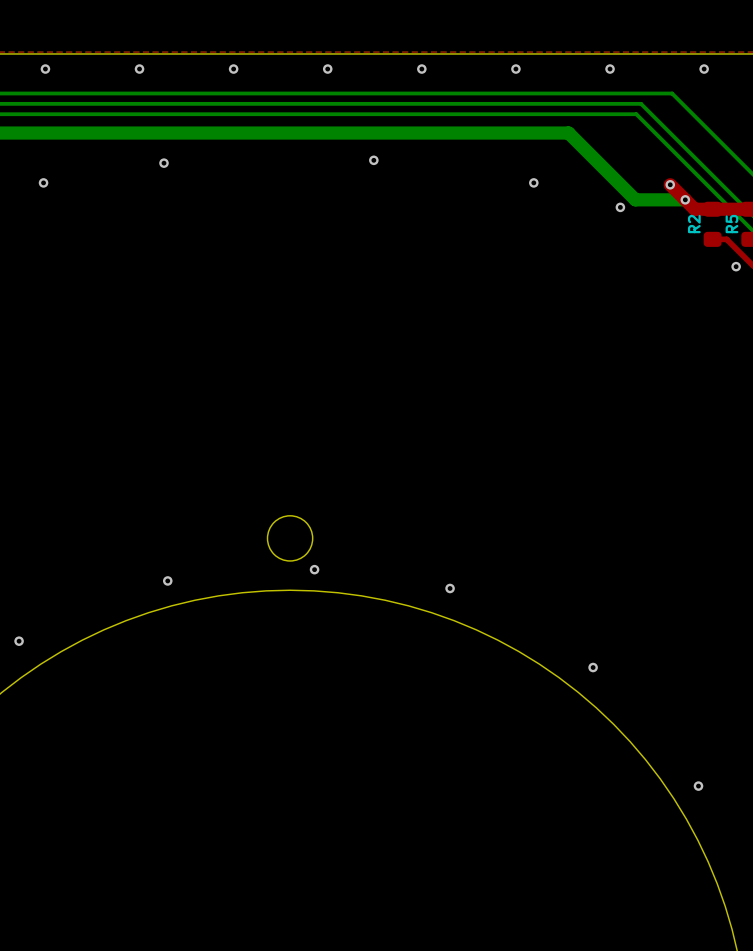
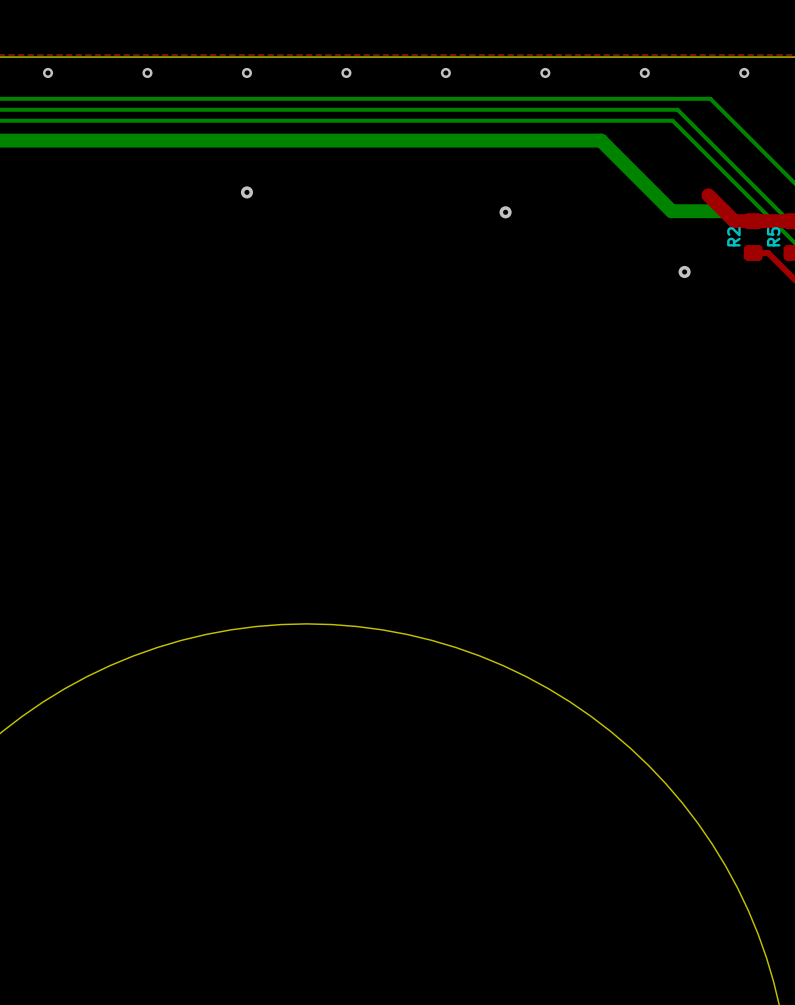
via: (373, 160) -> none
via: (164, 163) -> none
via: (43, 182) -> none
via: none -> (246, 192)
via: (533, 182) -> none
via: (670, 184) -> none
via: (685, 199) -> none
via: none -> (505, 212)
via: (620, 207) -> none
via: none -> (684, 271)
via: (736, 266) -> none
round board edge: [267, 515, 314, 562] -> none
via: (314, 569) -> none
via: (167, 580) -> none
via: (450, 588) -> none
via: (19, 641) -> none
via: (593, 667) -> none
via: (698, 786) -> none

